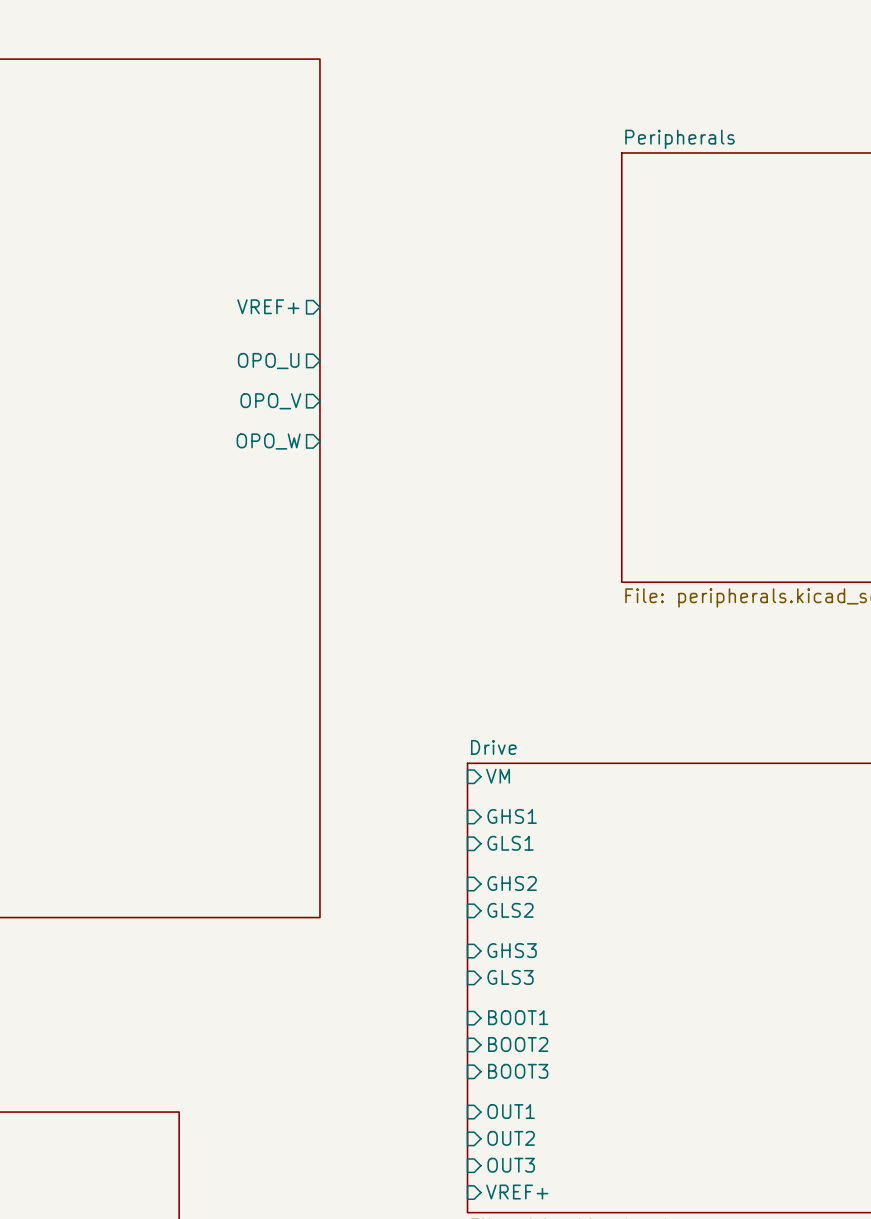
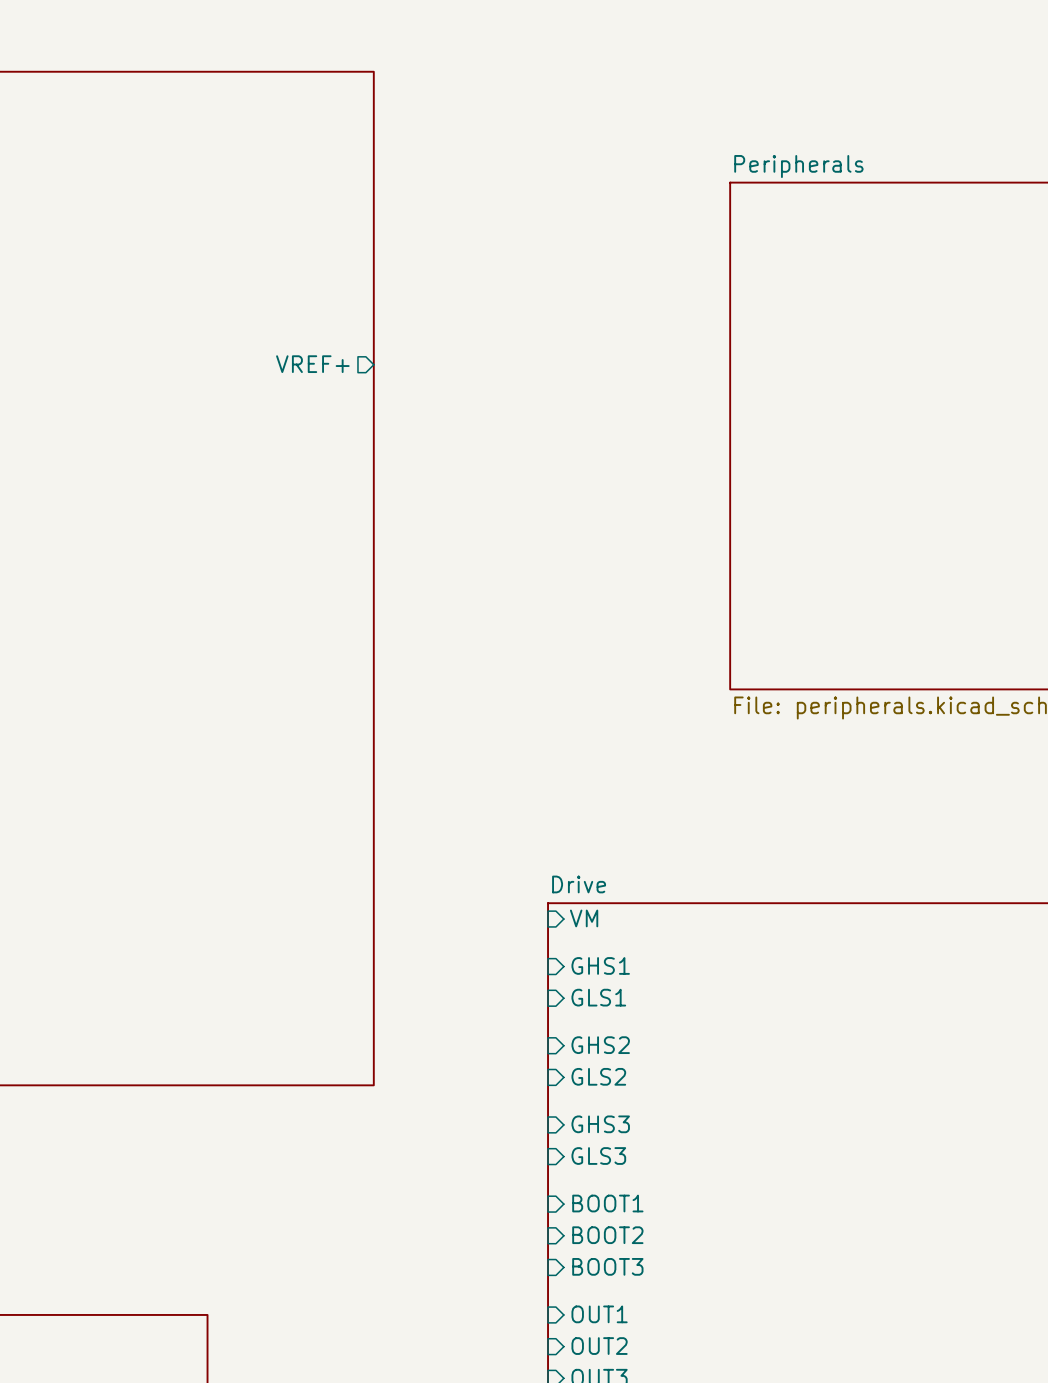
sheet pin: OPO_U (268, 361) -> none
sheet pin: OPO_V (270, 401) -> none
sheet pin: OPO_W (268, 441) -> none

